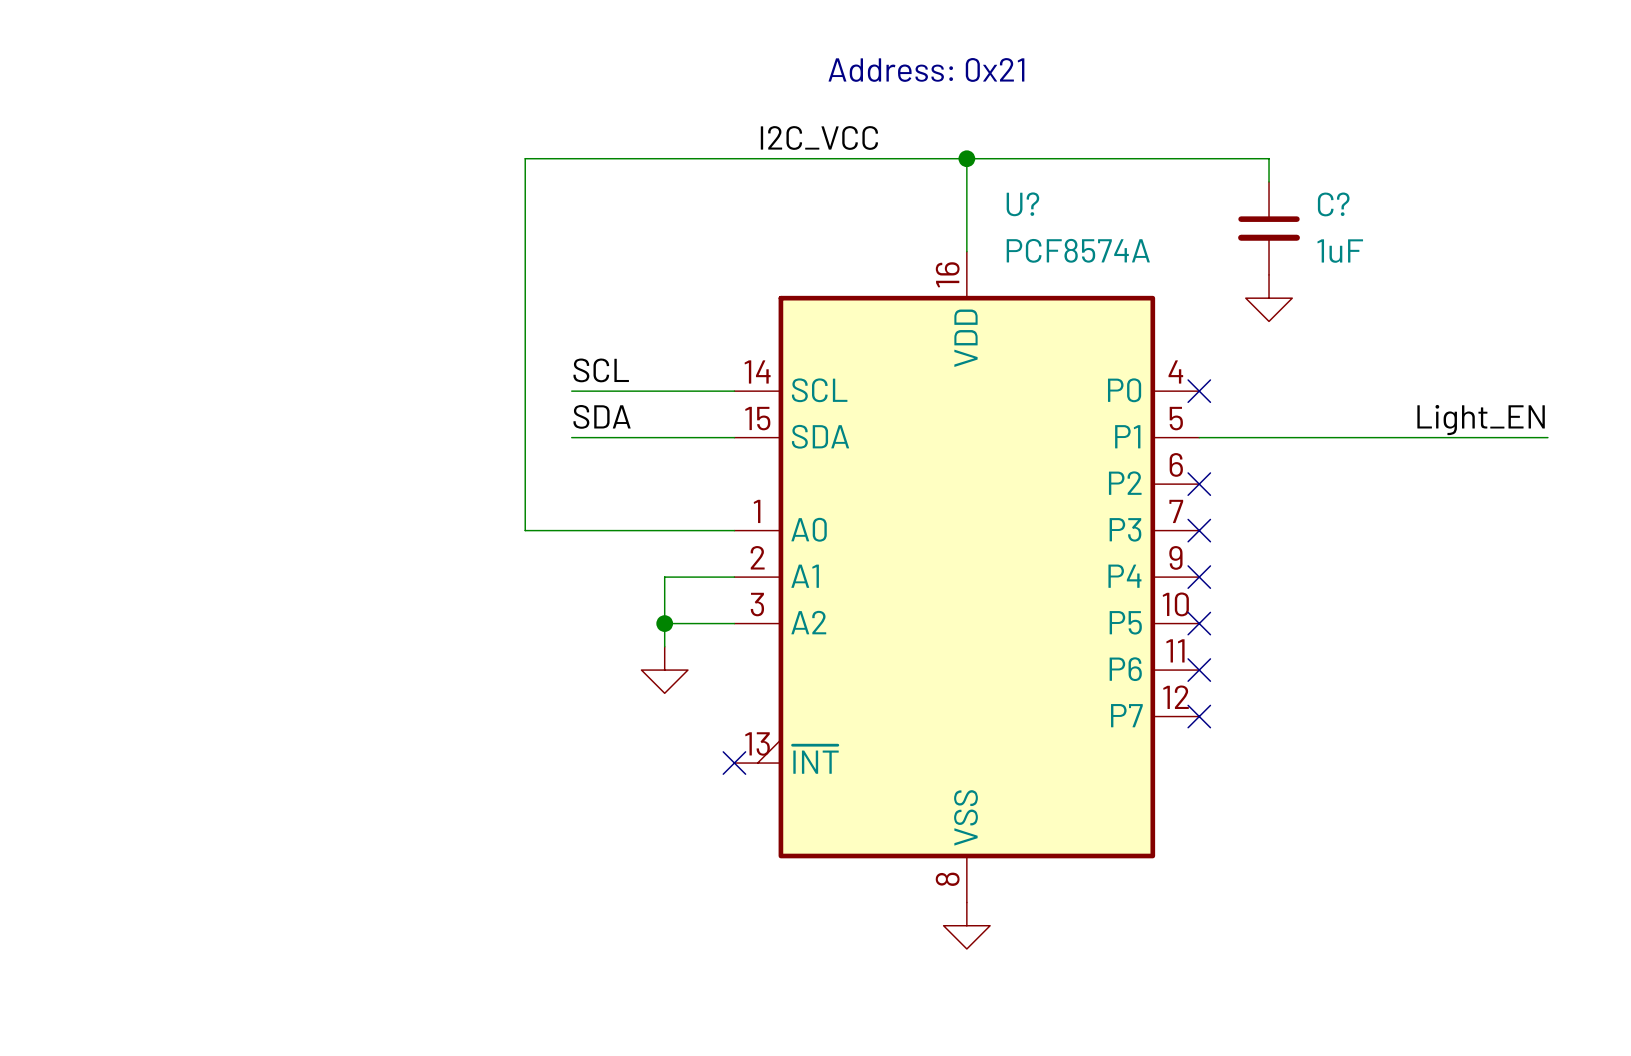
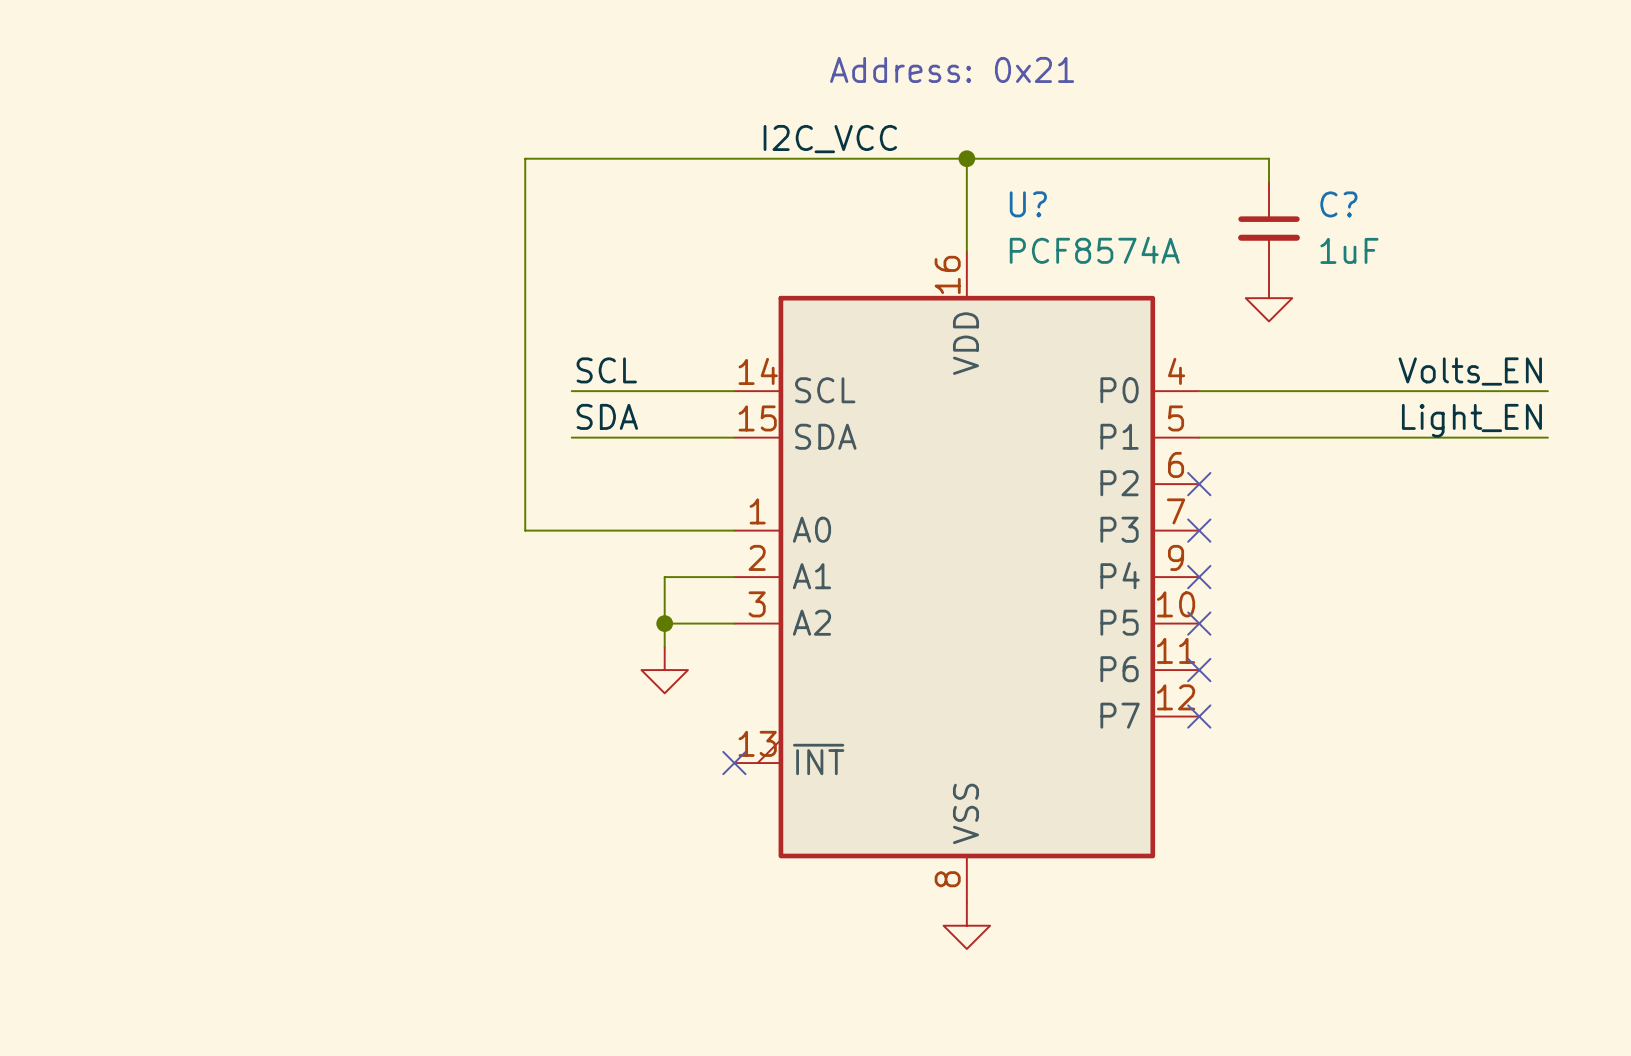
label: none -> Volts_EN (1470, 371)
wire: none -> (1199, 391) (1547, 391)
no-connect mark: (1199, 391) -> none

